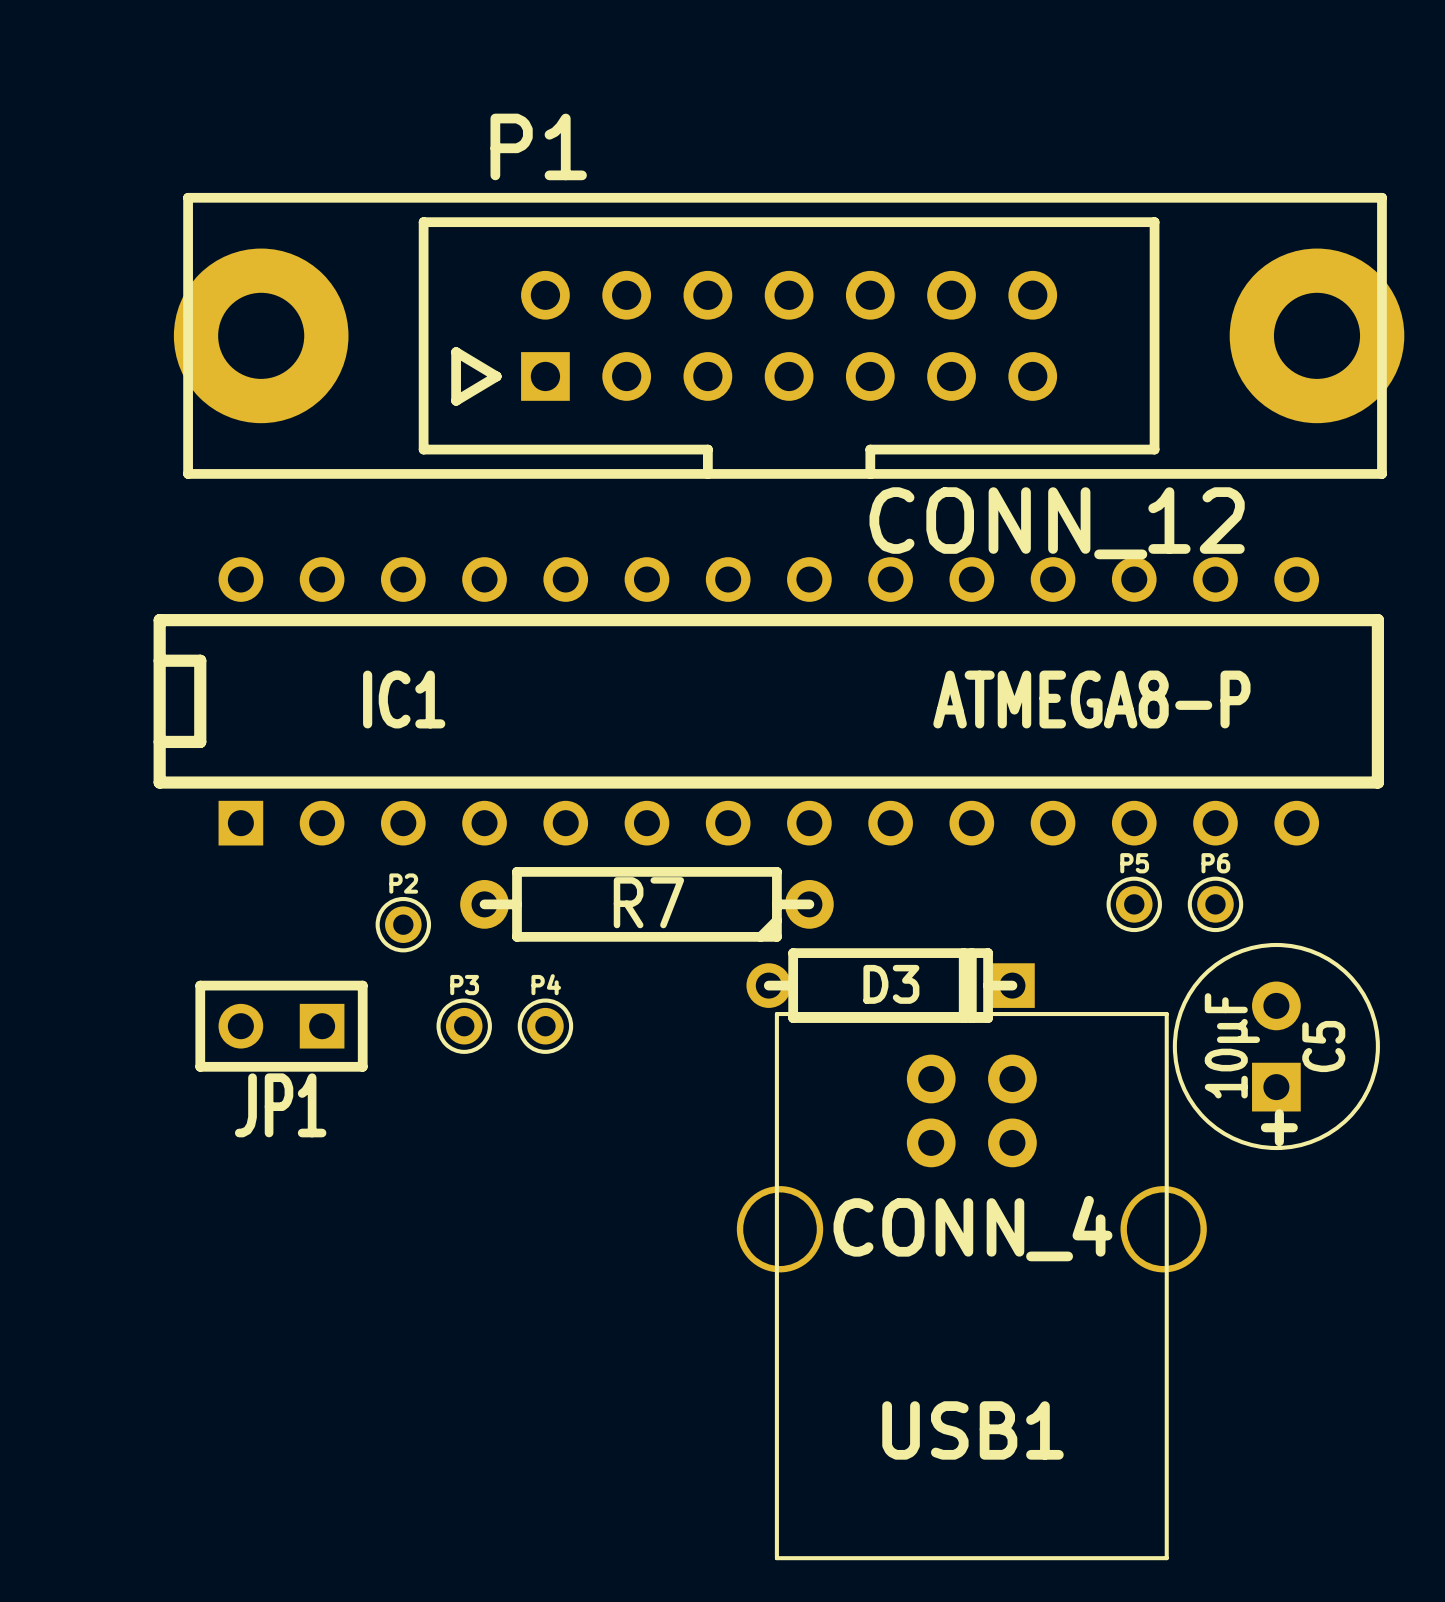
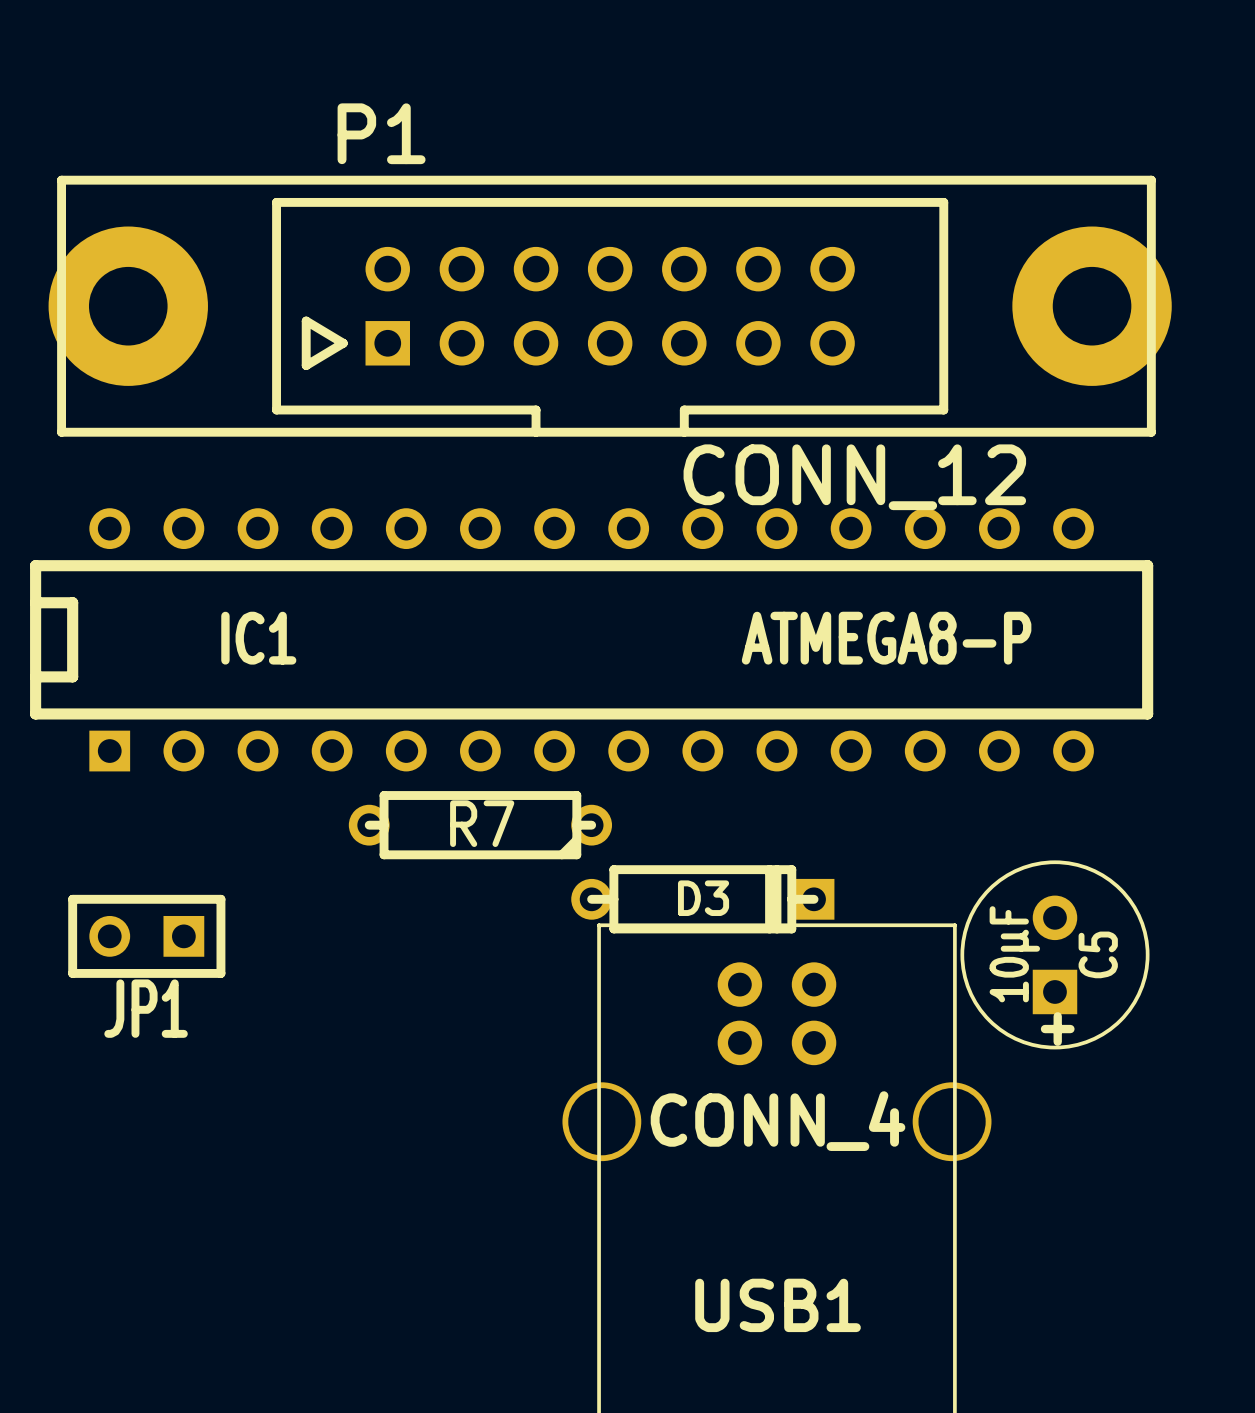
R7 footprint: [460, 867, 834, 942] -> [348, 791, 613, 860]
P5: (1134, 904) -> none
P6: (1215, 904) -> none
P2: (403, 924) -> none
P3: (464, 1026) -> none
P4: (545, 1026) -> none

